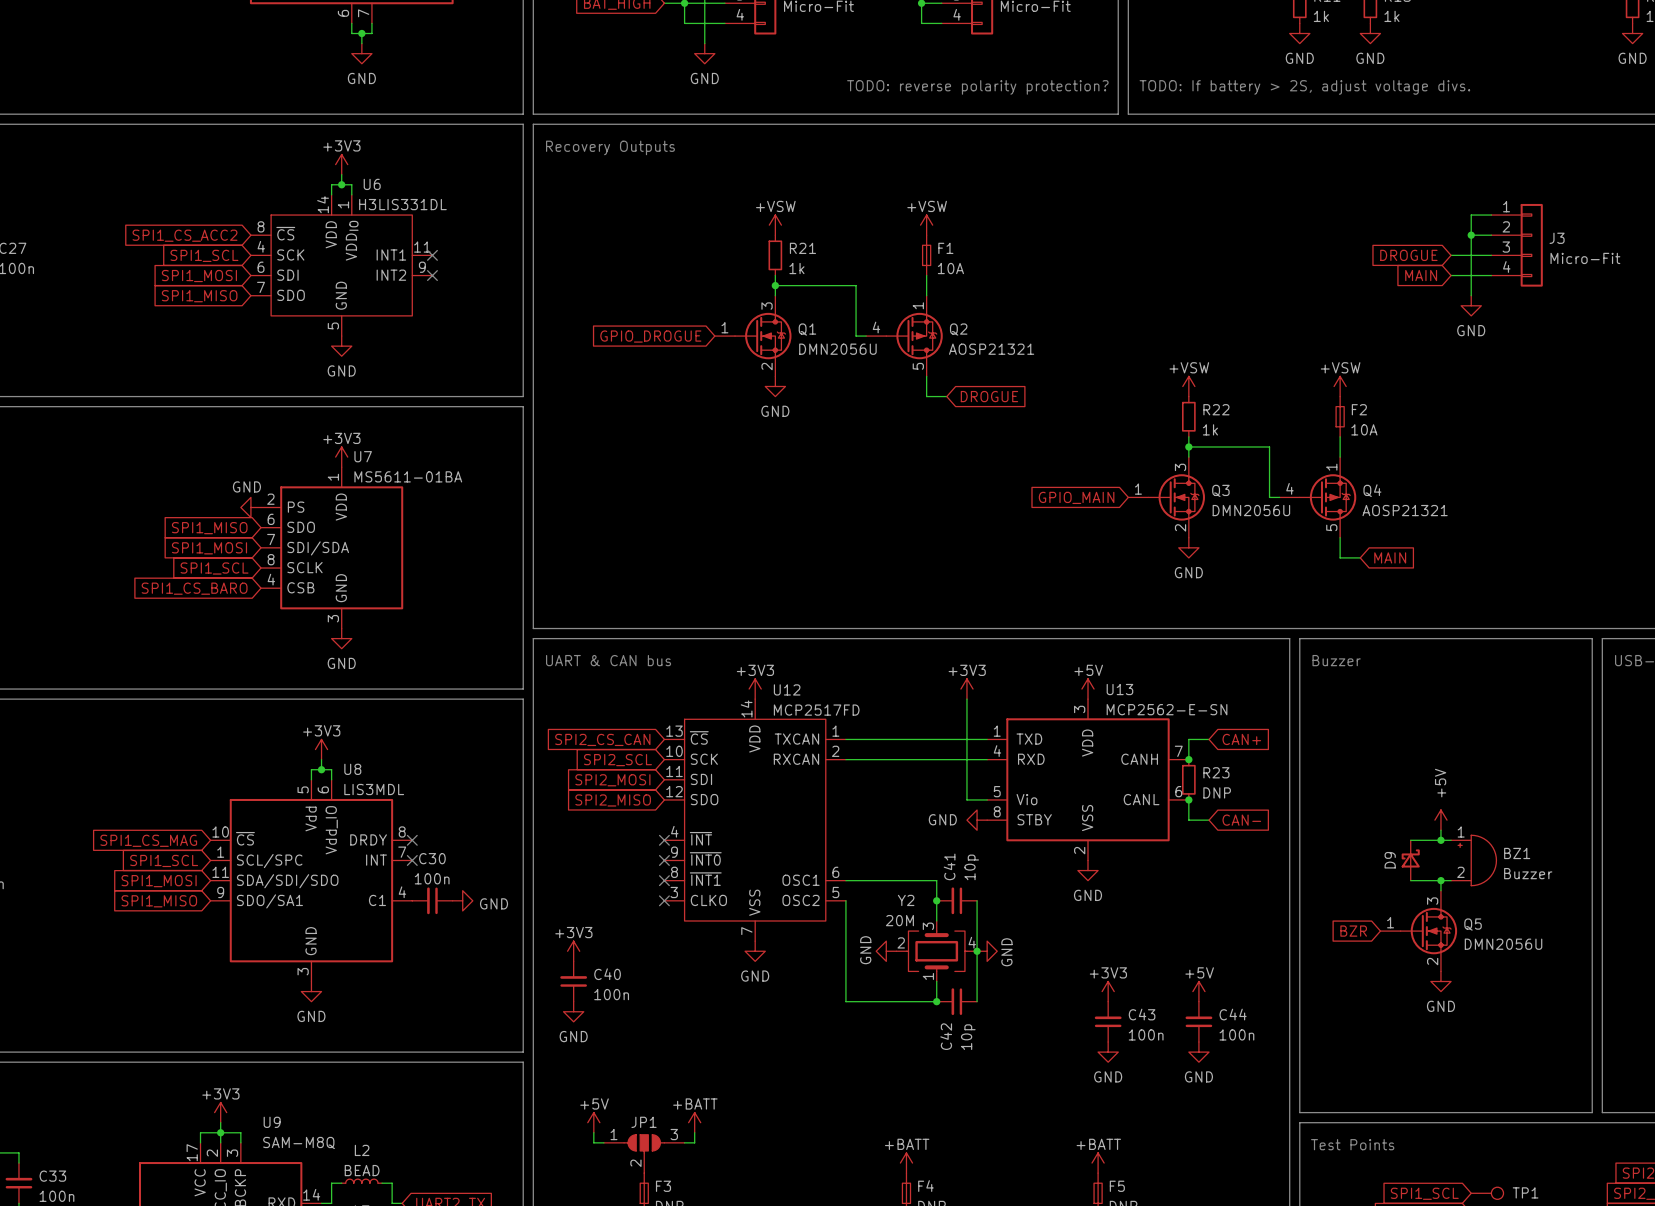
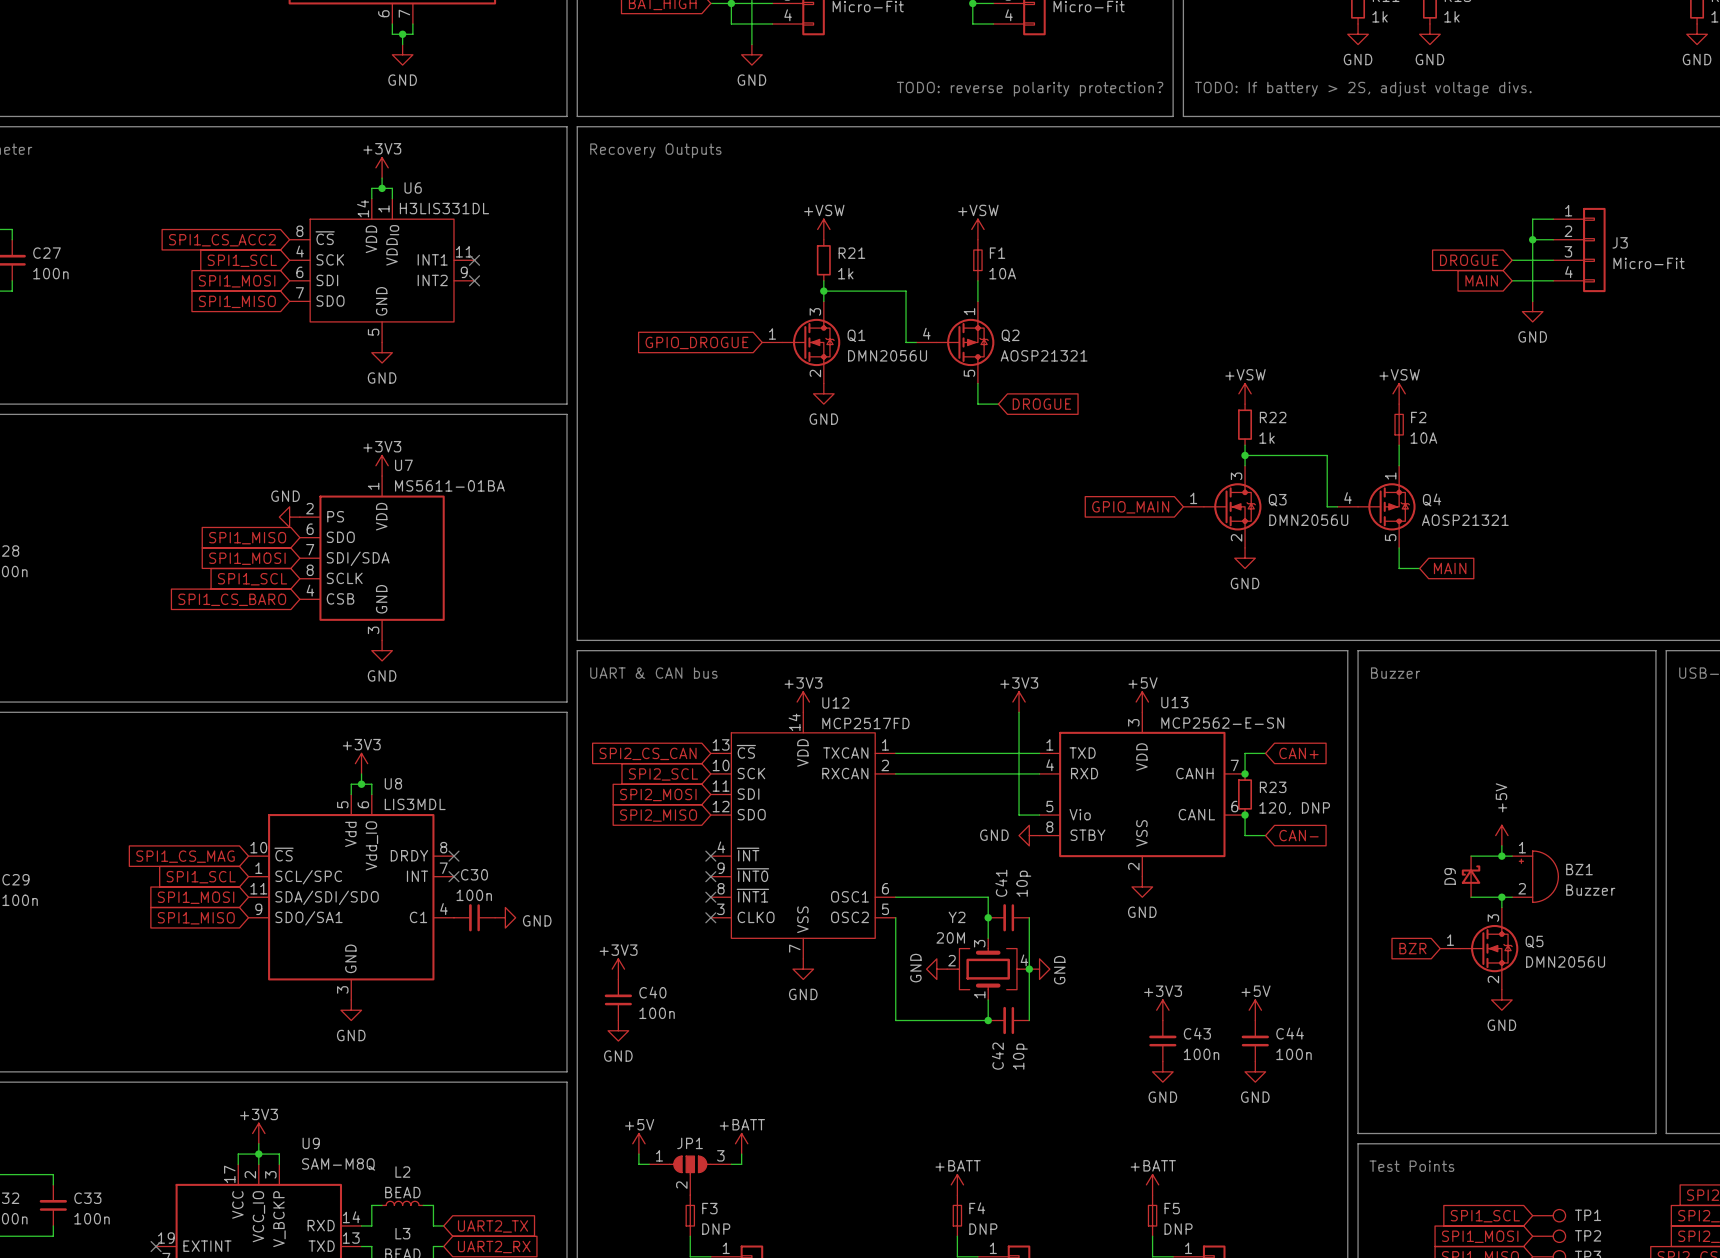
R23 value: DNP (1217, 792) -> 120, DNP (1294, 808)

